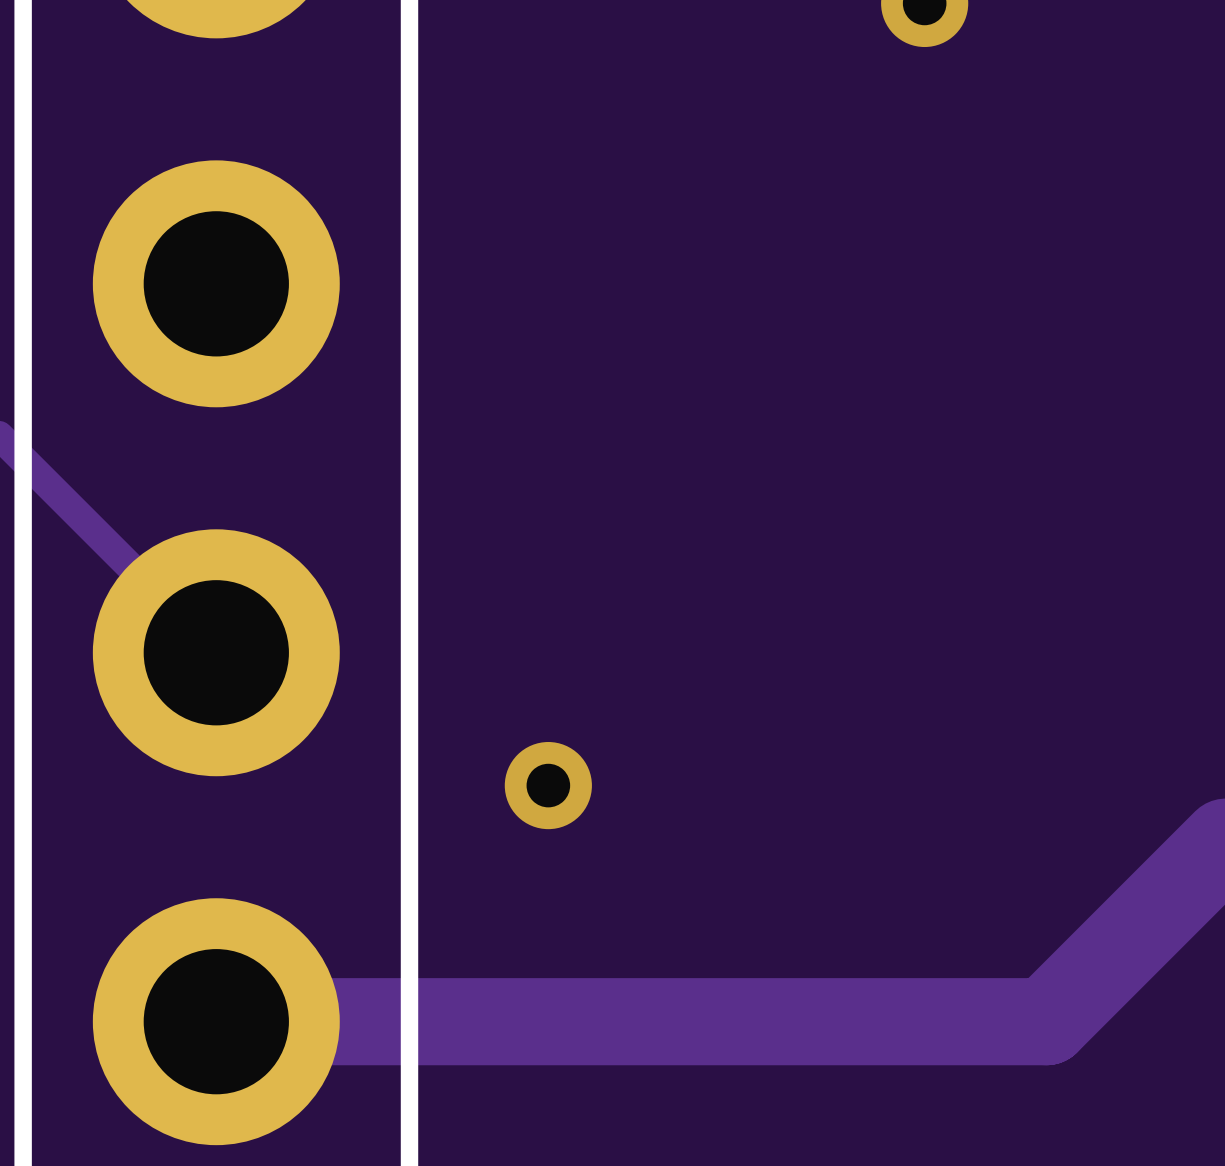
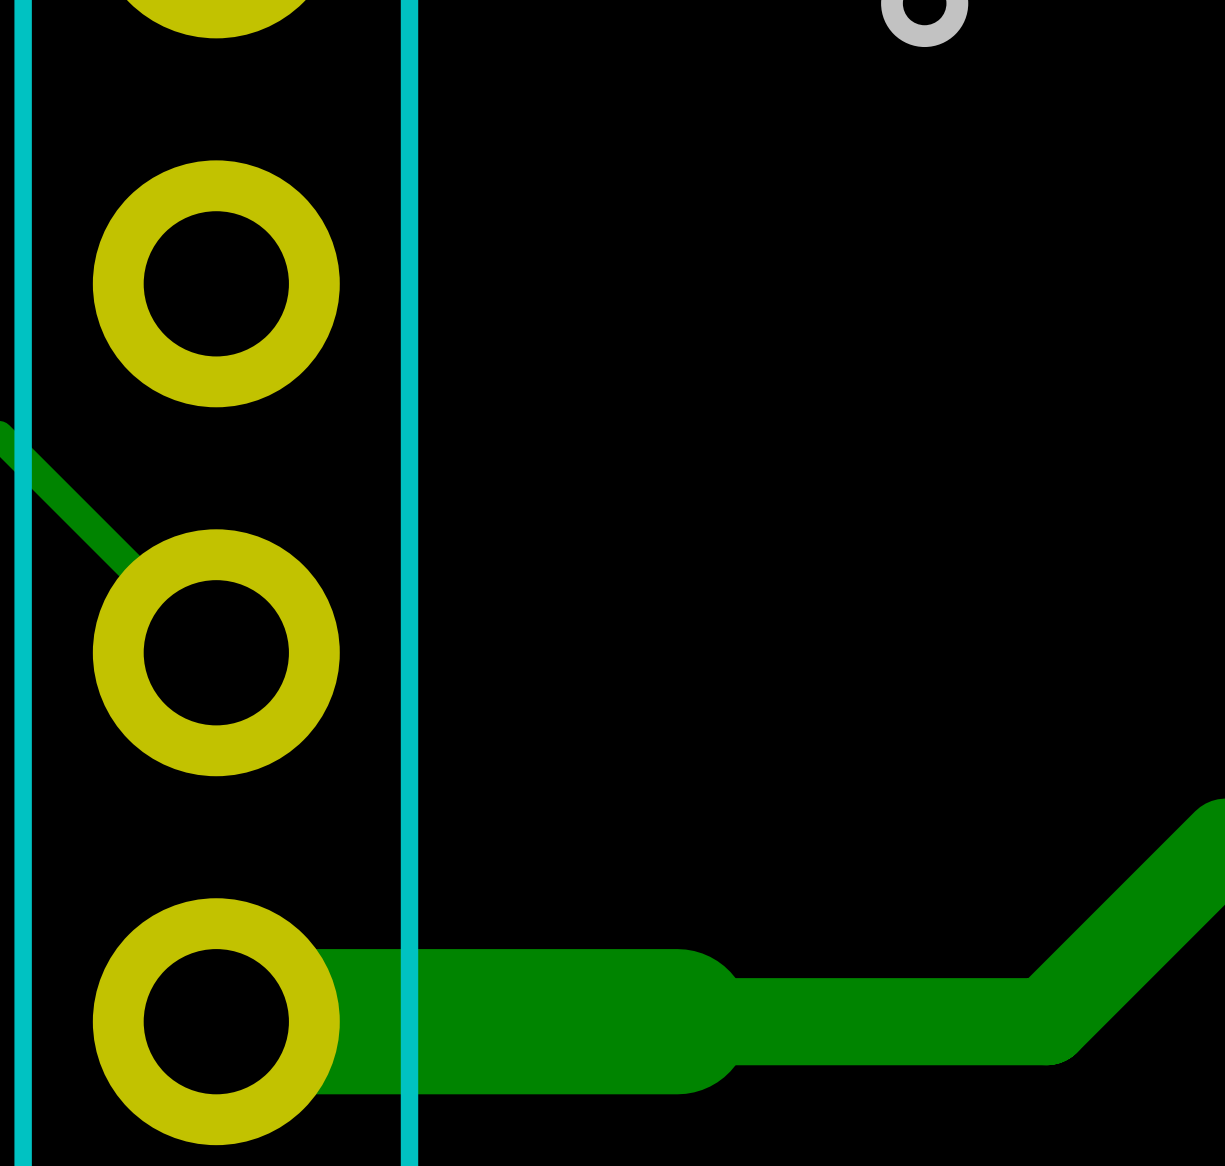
via: (548, 785) -> none
track width: thin (677, 1021) (216, 1021) -> thick (677, 1021) (216, 1021)

